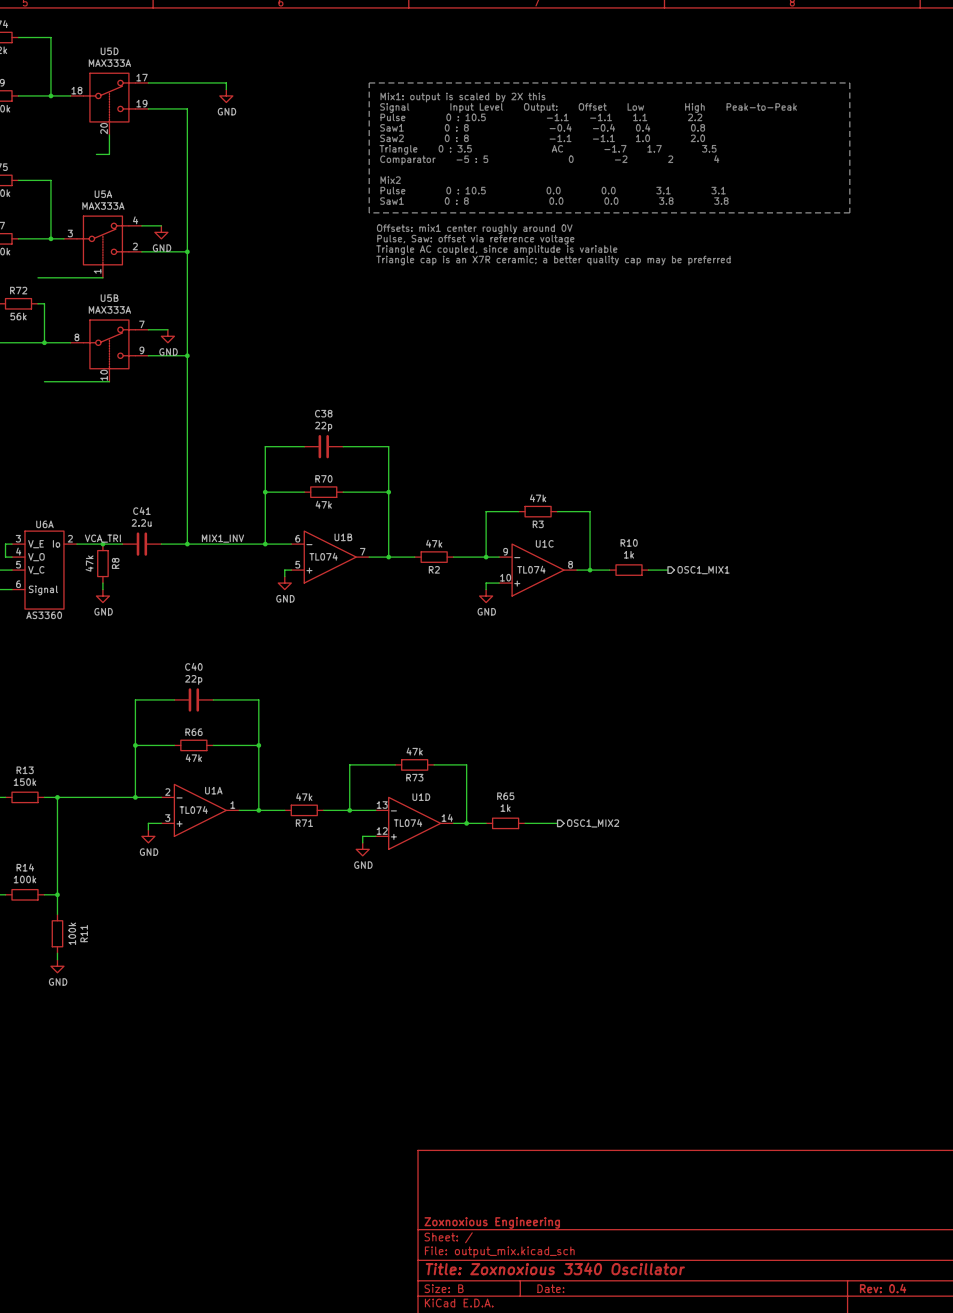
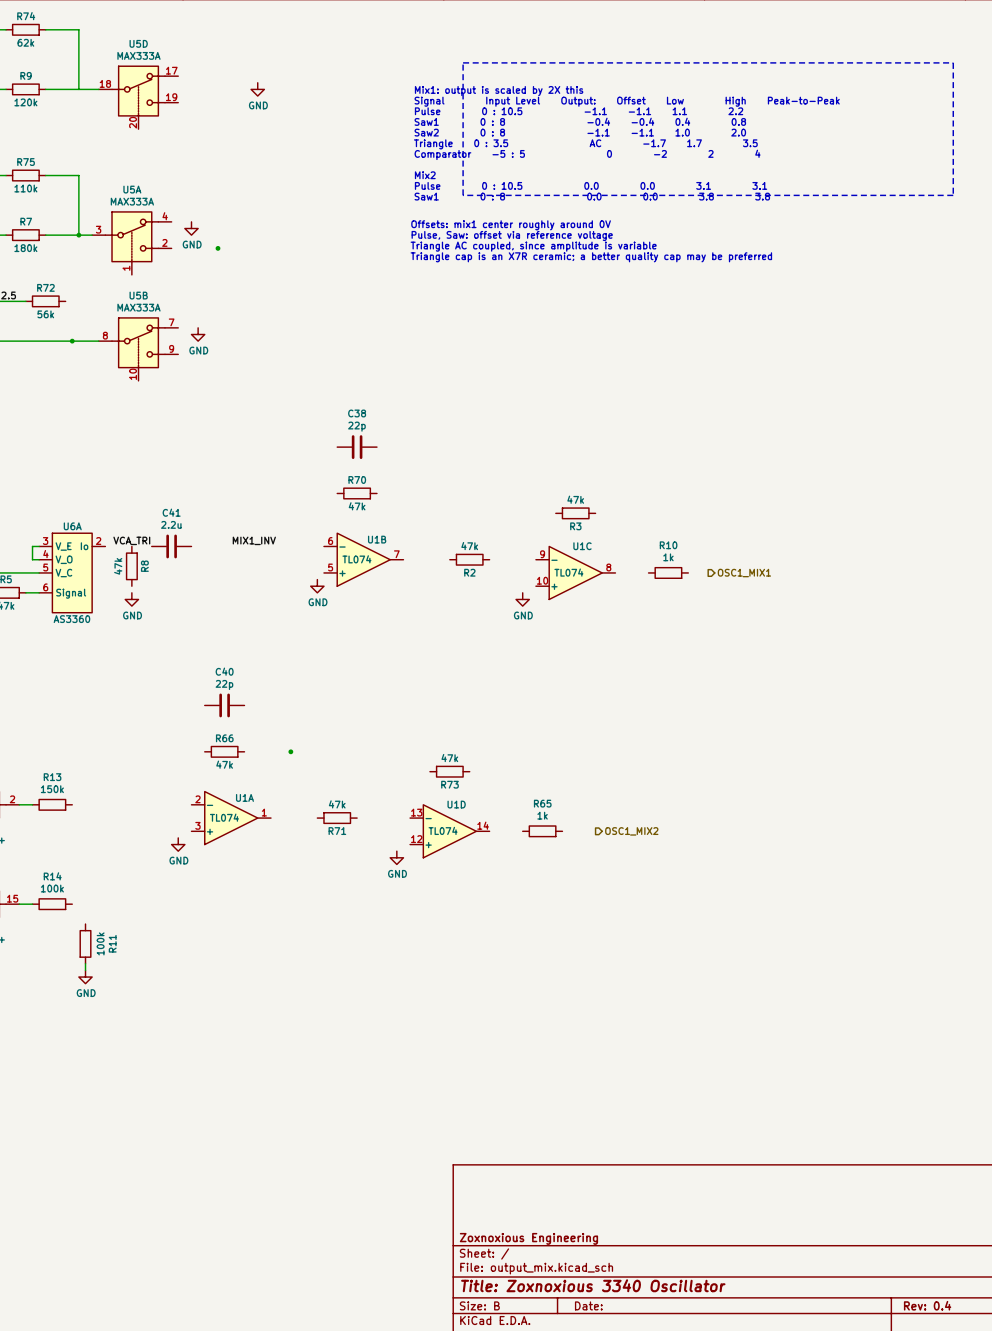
wire: (148, 82) (226, 82) (226, 89) -> none
line: (369, 82) (849, 82) (849, 212) (369, 212) (369, 82) -> (463, 62) (953, 62) (953, 195) (463, 195) (463, 62)
junction: (50, 95) -> none
wire: (148, 108) (187, 108) (187, 544) -> none
wire: (109, 134) (109, 154) (96, 154) -> none
wire: (141, 225) (161, 225) -> none
wire: (141, 251) (187, 251) -> none
wire: (37, 277) (102, 277) -> none
wire: (37, 303) (44, 303) (44, 342) -> none
wire: (148, 329) (167, 329) -> none
wire: (148, 355) (187, 355) -> none
junction: (187, 355) -> none
wire: (44, 381) (109, 381) -> none
wire: (304, 446) (265, 446) (265, 544) -> none
wire: (343, 446) (388, 446) (388, 557) -> none
wire: (265, 492) (304, 492) -> none
junction: (265, 492) -> none
wire: (343, 492) (388, 492) -> none
junction: (388, 492) -> none
wire: (518, 511) (486, 511) (486, 557) -> none
wire: (557, 511) (590, 511) (590, 570) -> none
wire: (76, 544) (122, 544) -> none
junction: (102, 544) -> none
wire: (161, 544) (291, 544) -> none
junction: (187, 544) -> none
junction: (265, 544) -> none
wire: (369, 557) (414, 557) -> none
junction: (388, 557) -> none
wire: (453, 557) (499, 557) -> none
junction: (486, 557) -> none
wire: (291, 570) (284, 570) (284, 576) -> none
wire: (577, 570) (609, 570) -> none
junction: (590, 570) -> none
wire: (648, 570) (667, 570) -> none
wire: (102, 583) (102, 589) -> none
wire: (499, 583) (486, 583) (486, 589) -> none
wire: (174, 699) (135, 699) (135, 797) -> none
wire: (213, 699) (258, 699) (258, 810) -> none
wire: (135, 745) (174, 745) -> none
junction: (135, 745) -> none
wire: (213, 745) (258, 745) -> none
wire: (395, 764) (349, 764) (349, 810) -> none
wire: (434, 764) (466, 764) (466, 823) -> none
wire: (44, 797) (161, 797) -> none
wire: (57, 797) (57, 914) -> none
junction: (57, 797) -> none
junction: (135, 797) -> none
wire: (239, 810) (284, 810) -> none
junction: (258, 810) -> none
wire: (323, 810) (375, 810) -> none
junction: (349, 810) -> none
wire: (161, 823) (148, 823) (148, 829) -> none
wire: (453, 823) (486, 823) -> none
junction: (466, 823) -> none
wire: (525, 823) (557, 823) -> none
wire: (375, 836) (362, 836) (362, 842) -> none
wire: (44, 894) (57, 894) -> none
junction: (57, 894) -> none

